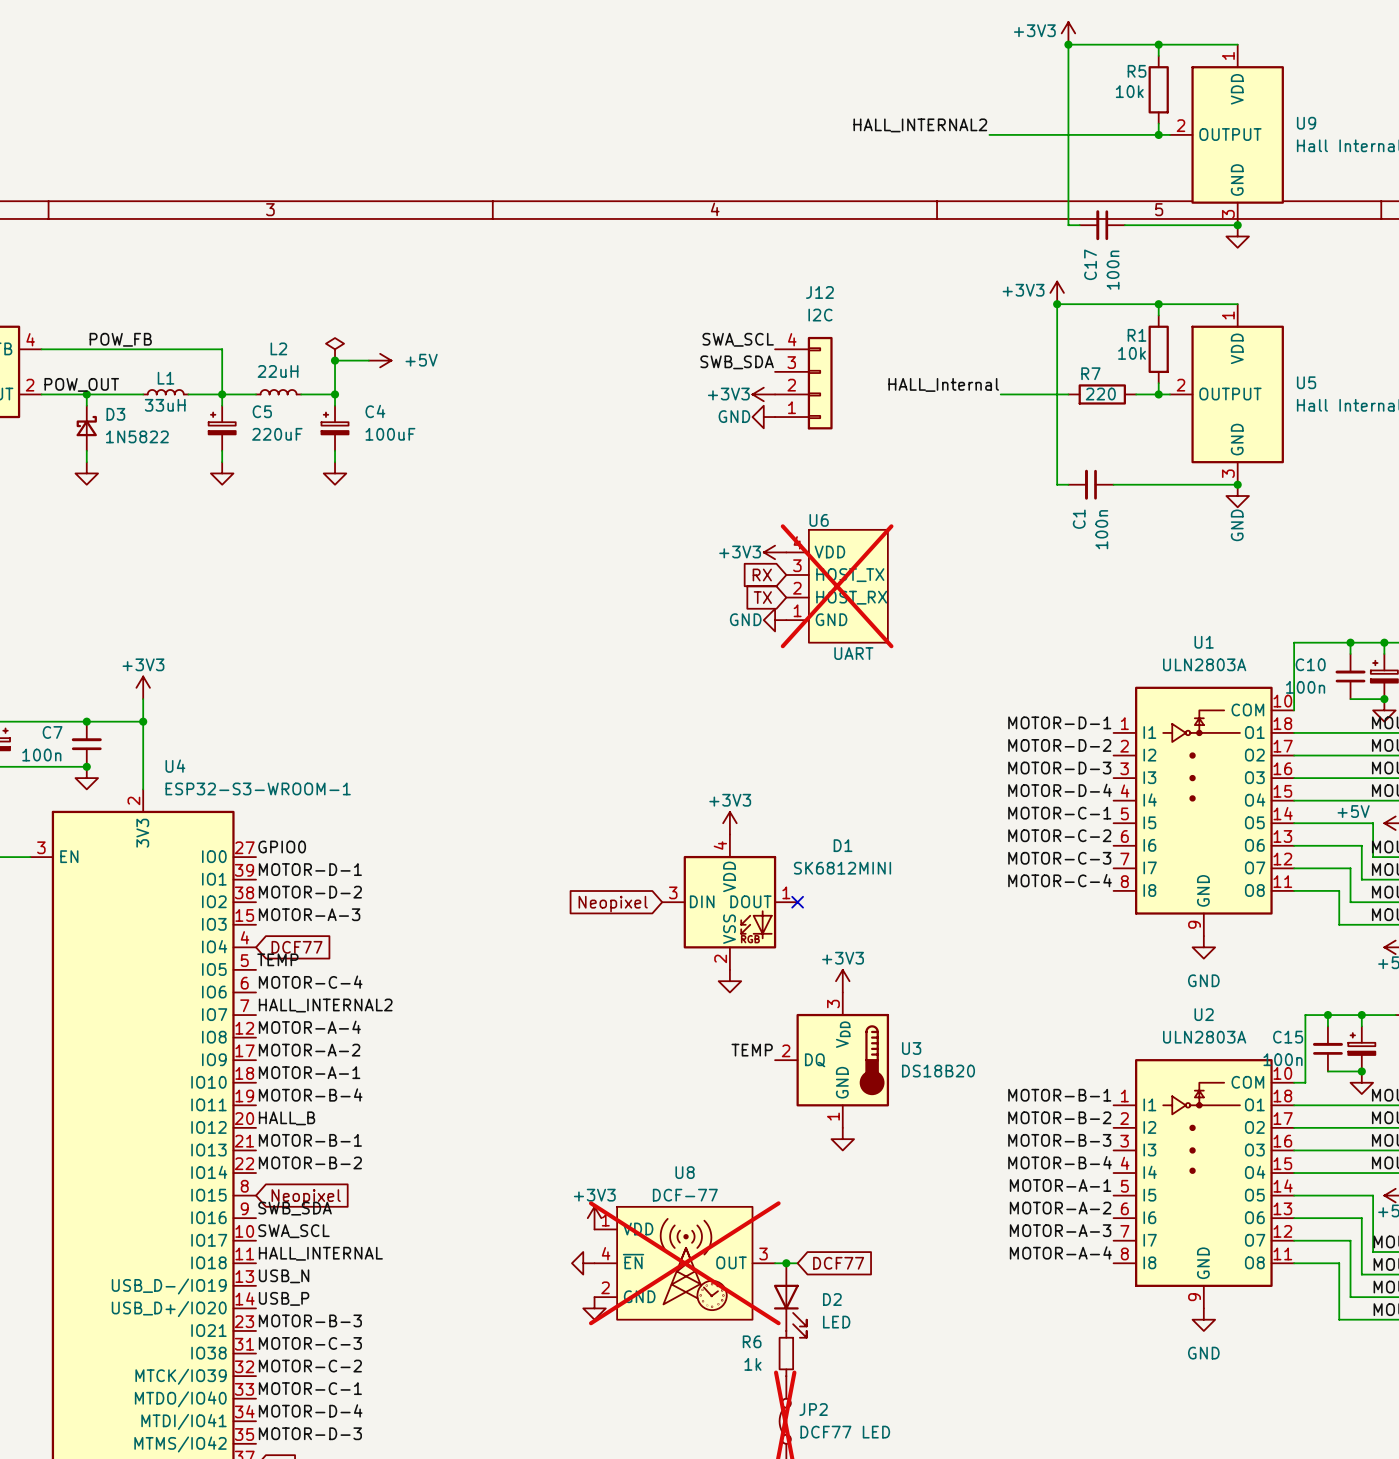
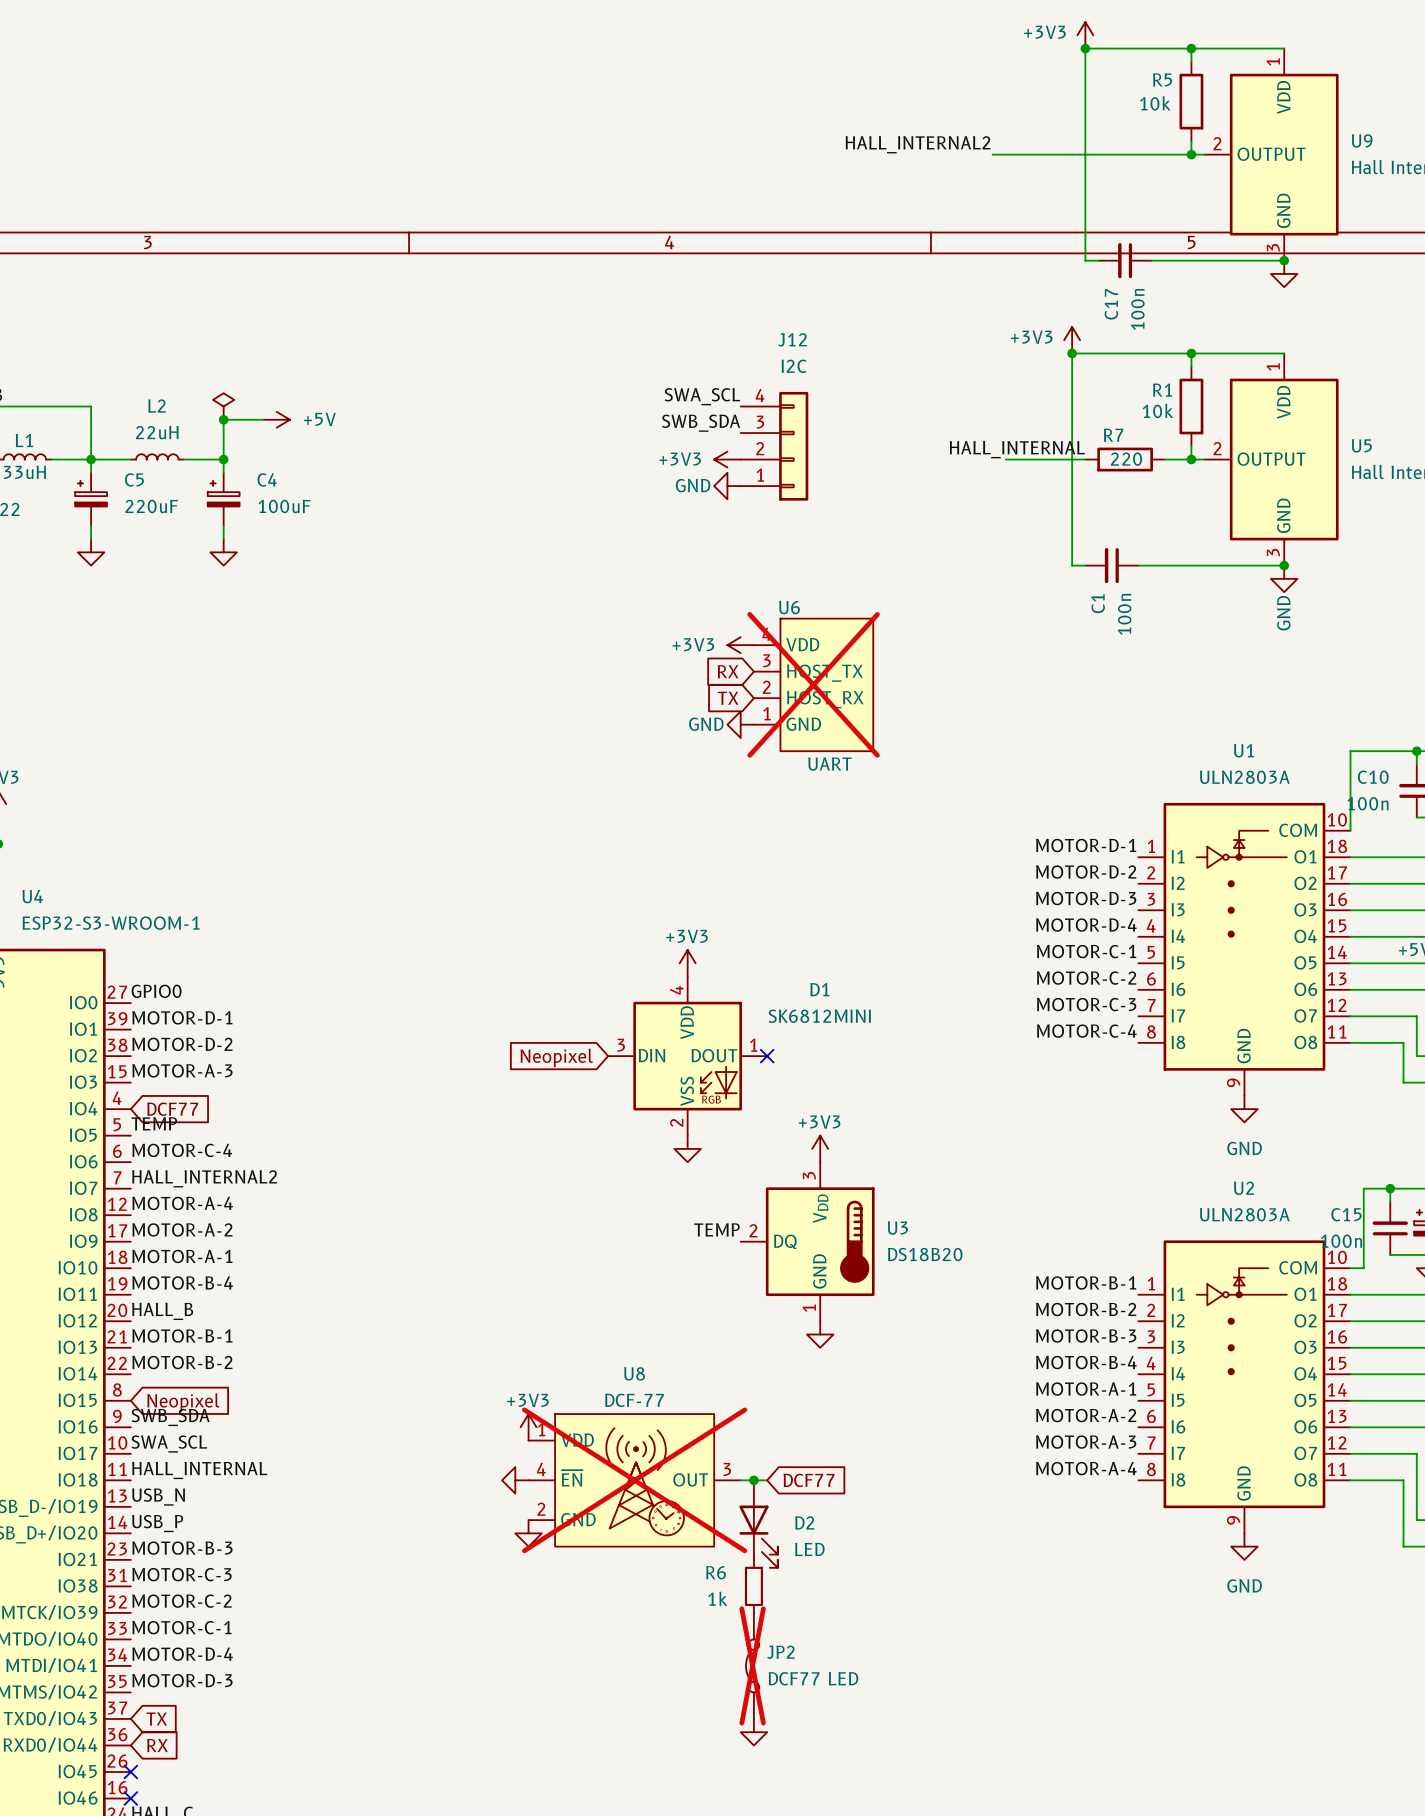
label: HALL_Internal (943, 384) -> none
label: none -> HALL_INTERNAL (1017, 449)

